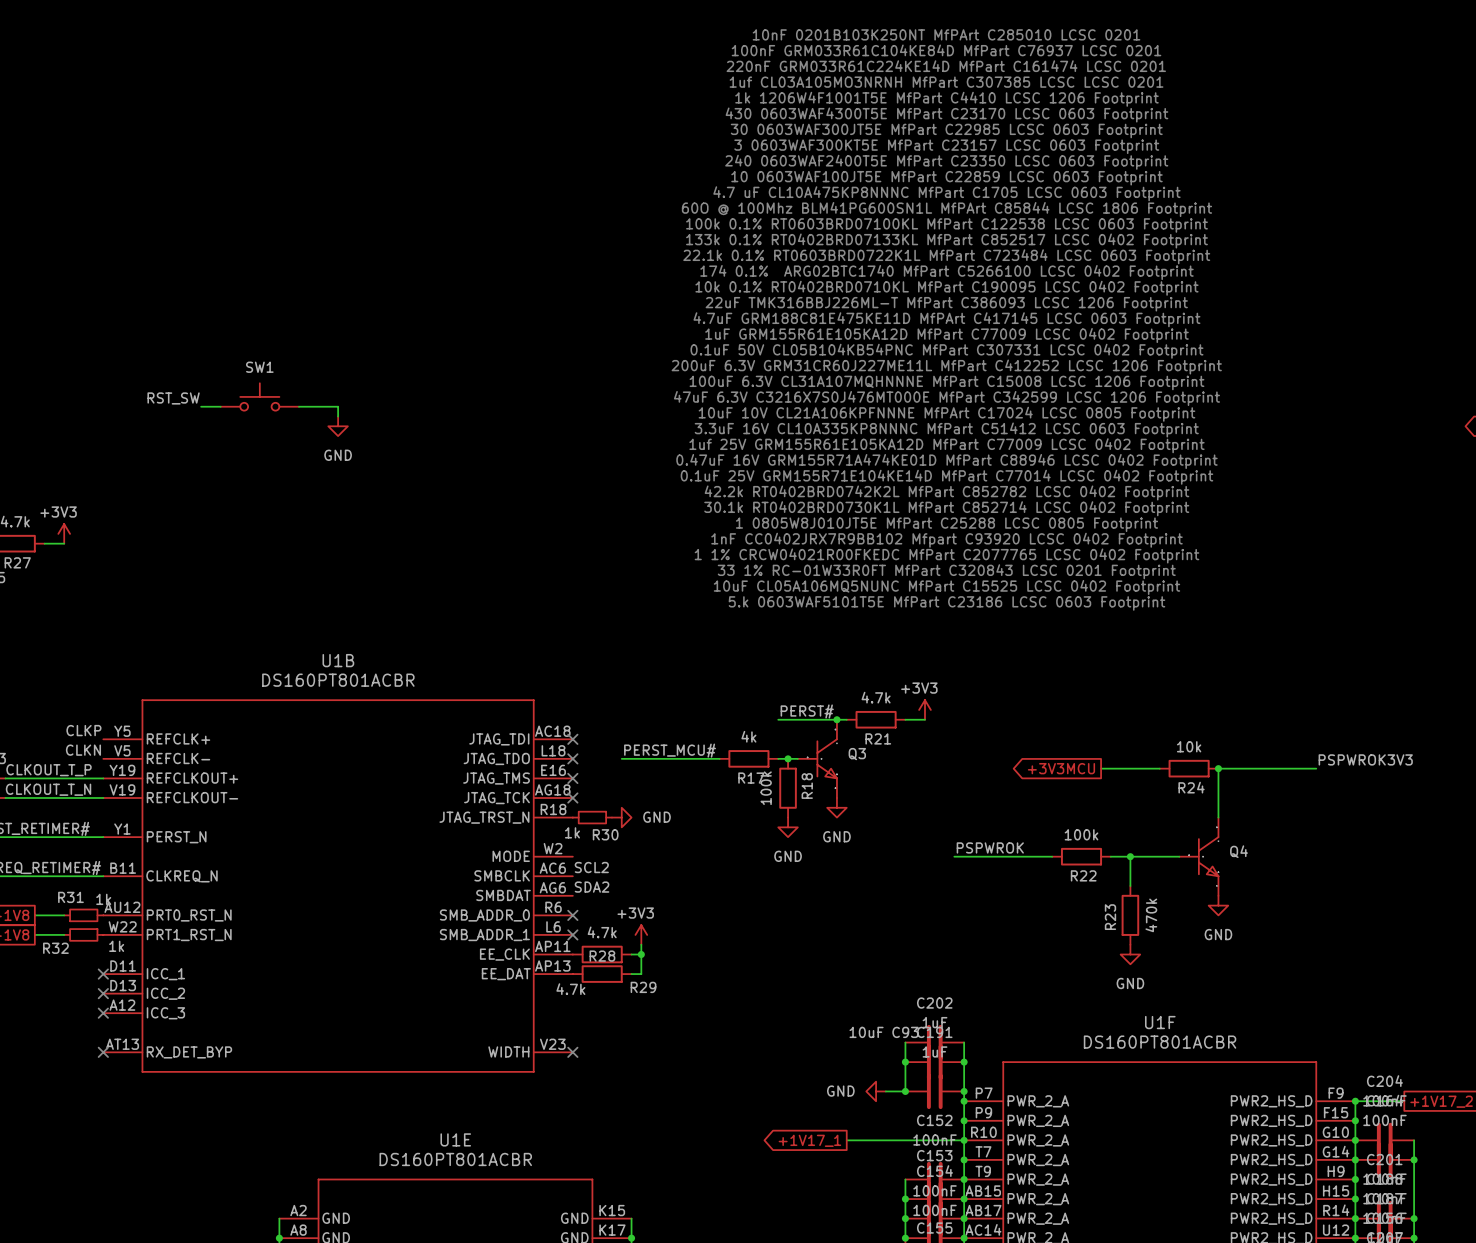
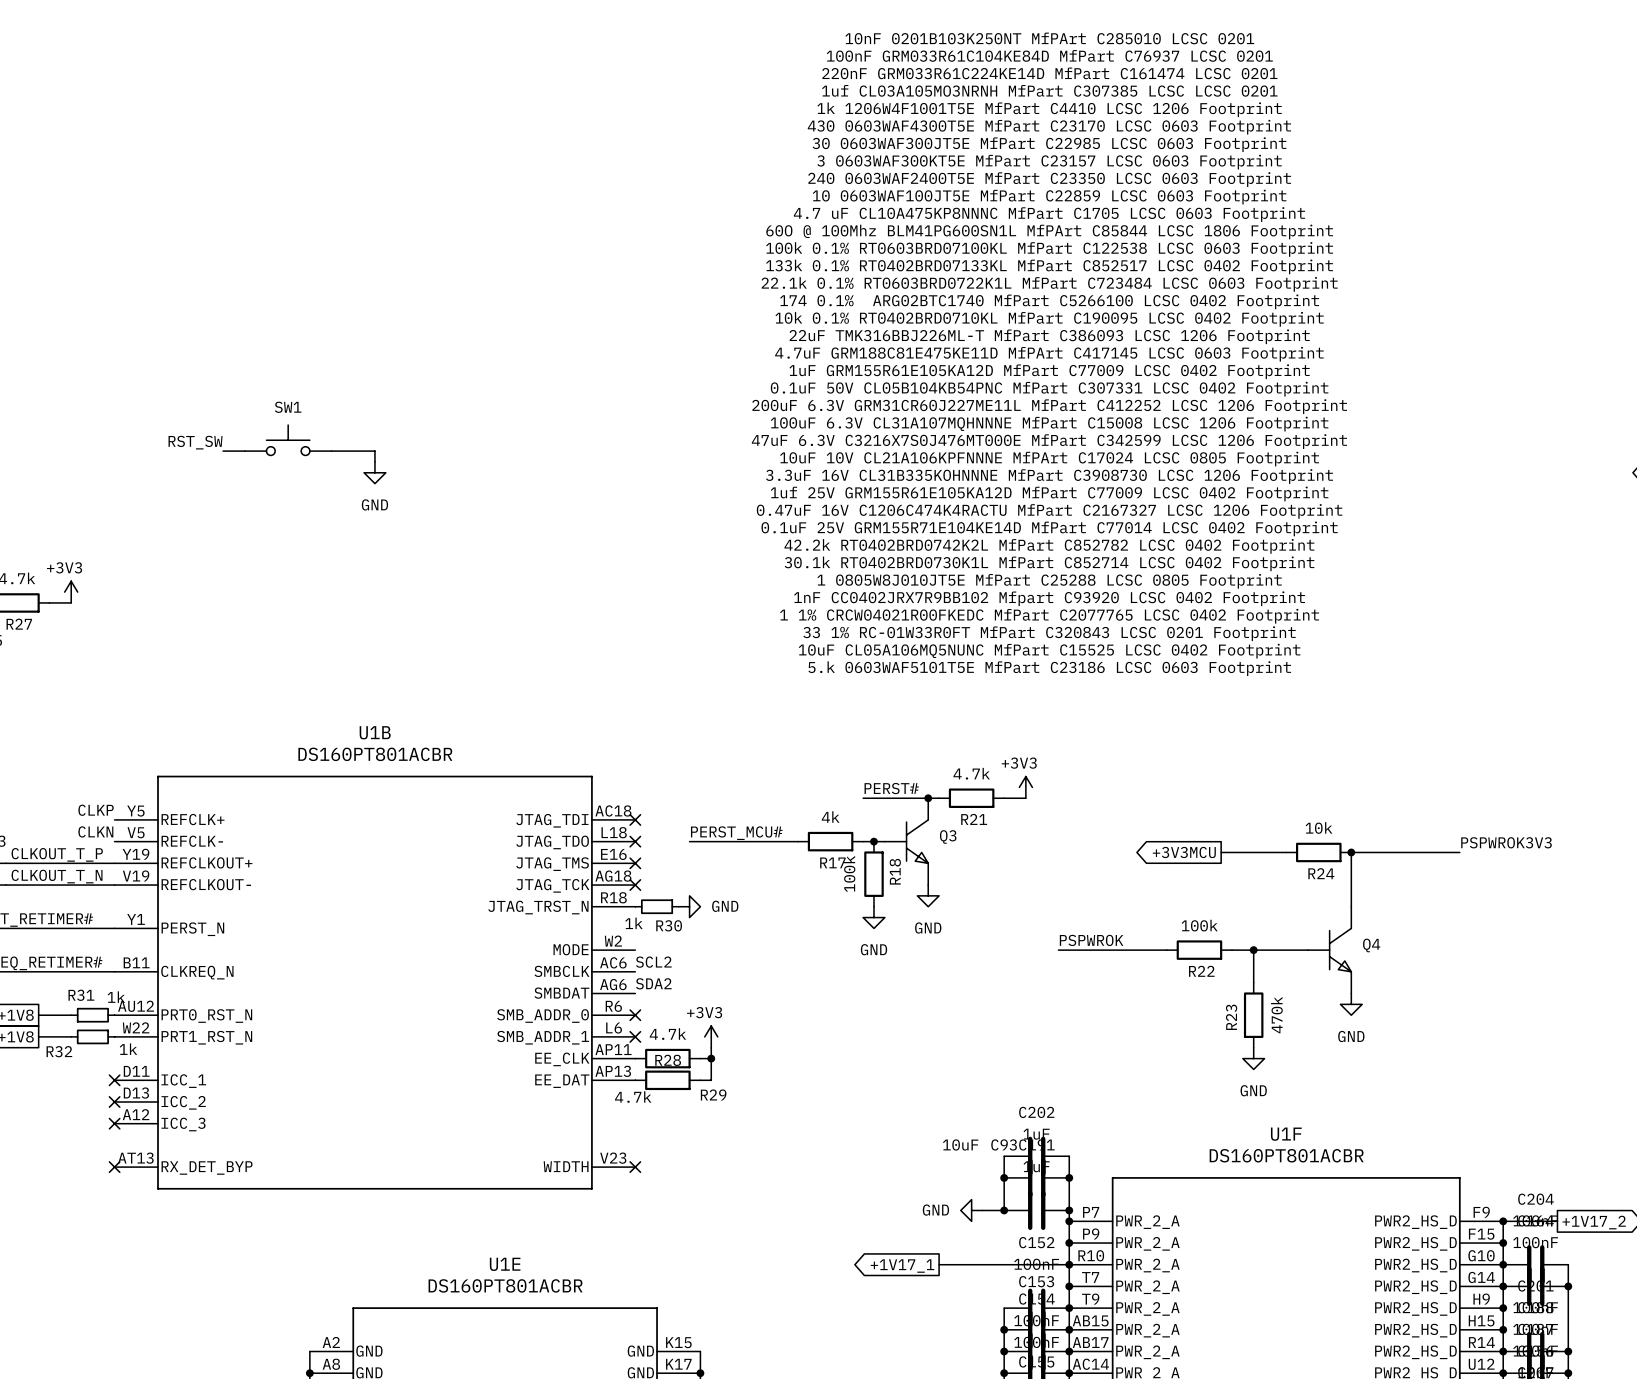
text: 3.3uF 16V CL10A335KP8NNNC MfPart C51412 LCSC 0603 Footprint (946, 429) -> 3.3uF 16V CL31B335KOHNNNE MfPart C3908730 LCSC 1206 Footprint (1049, 476)
text: 0.47uF 16V GRM155R71A474KE01D MfPart C88946 LCSC 0402 Footprint (946, 461) -> 0.47uF 16V C1206C474K4RACTU MfPart C2167327 LCSC 1206 Footprint (1049, 511)

